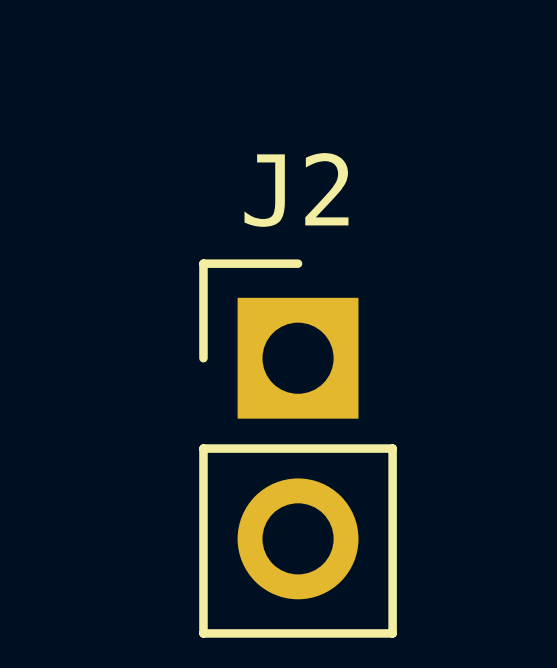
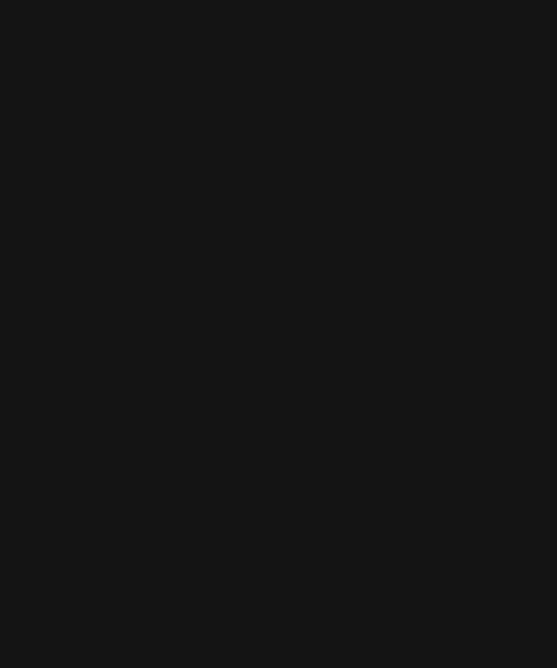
J2: (298, 448) -> none

